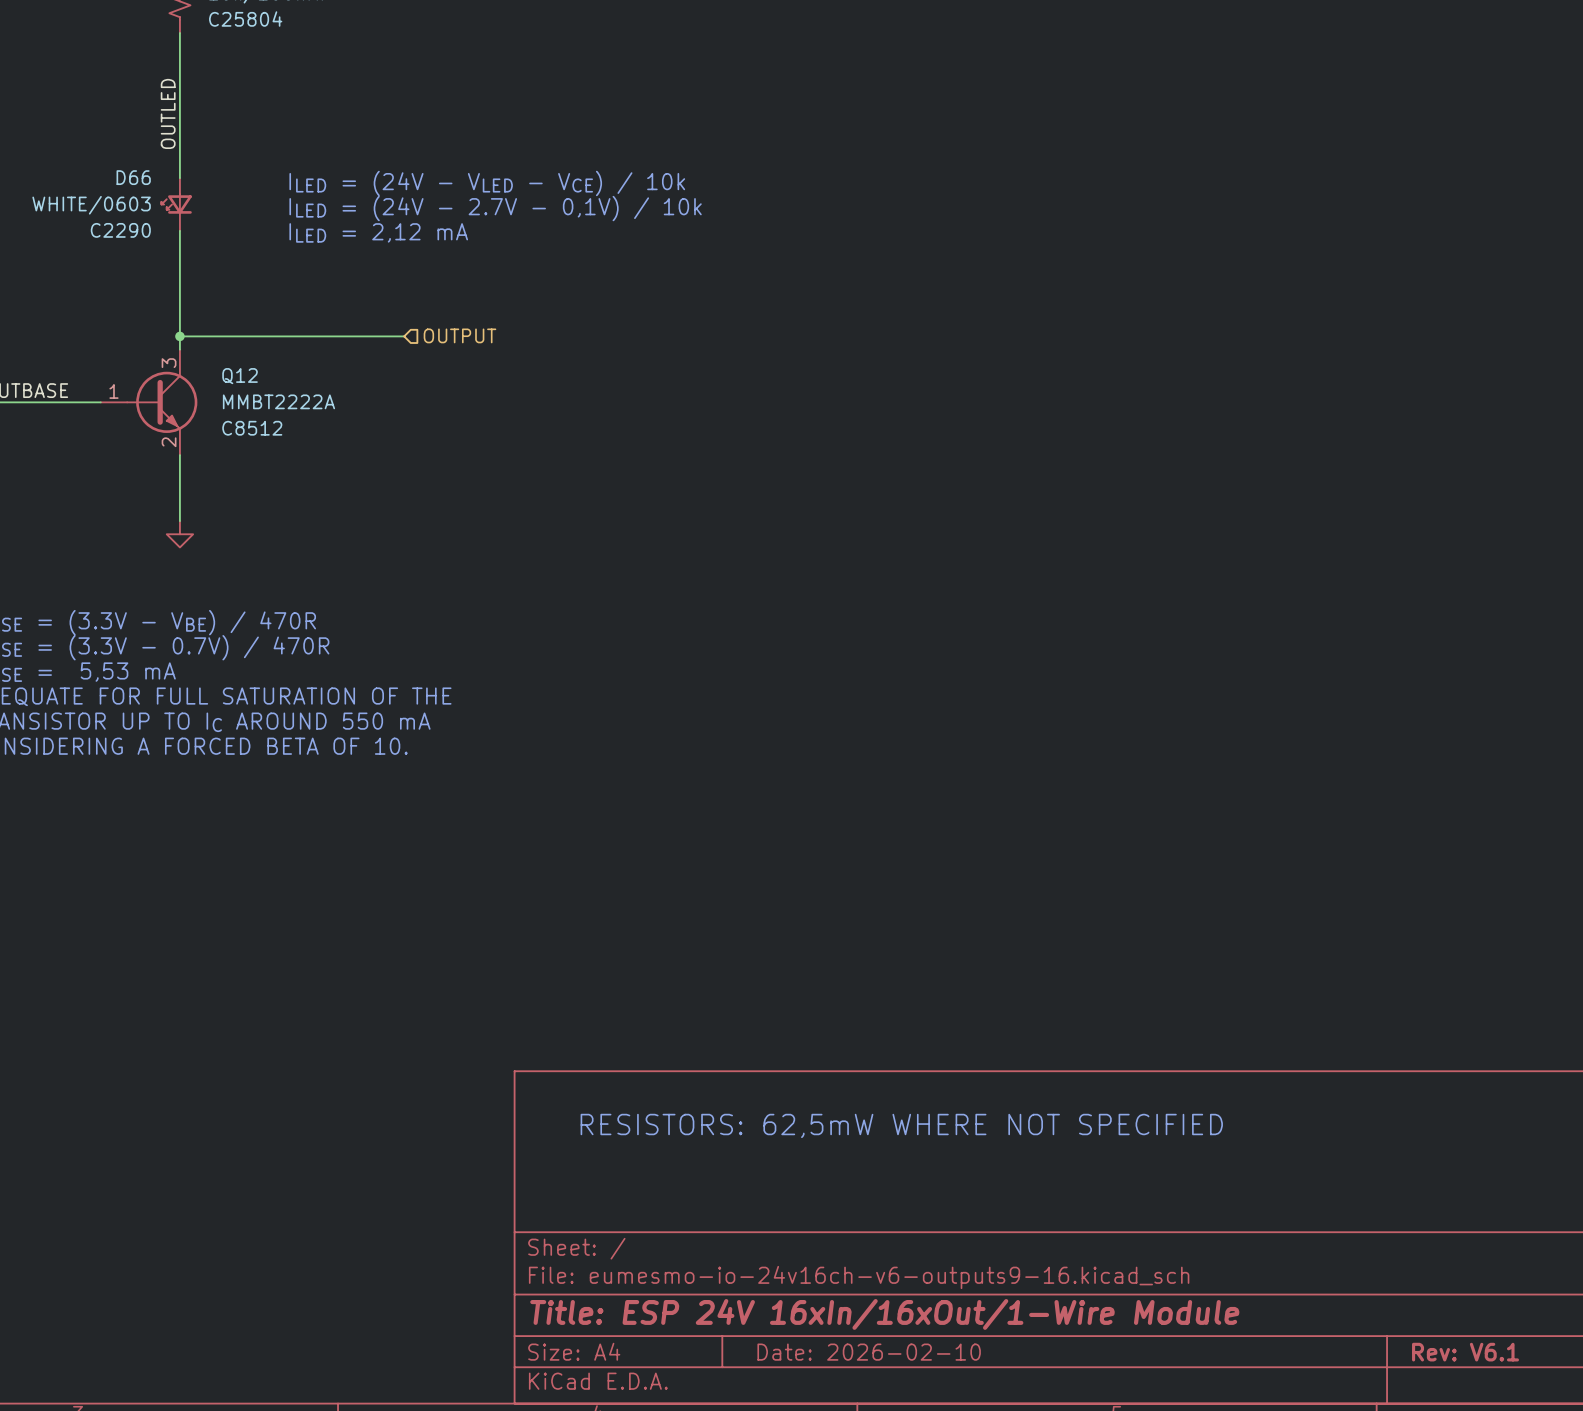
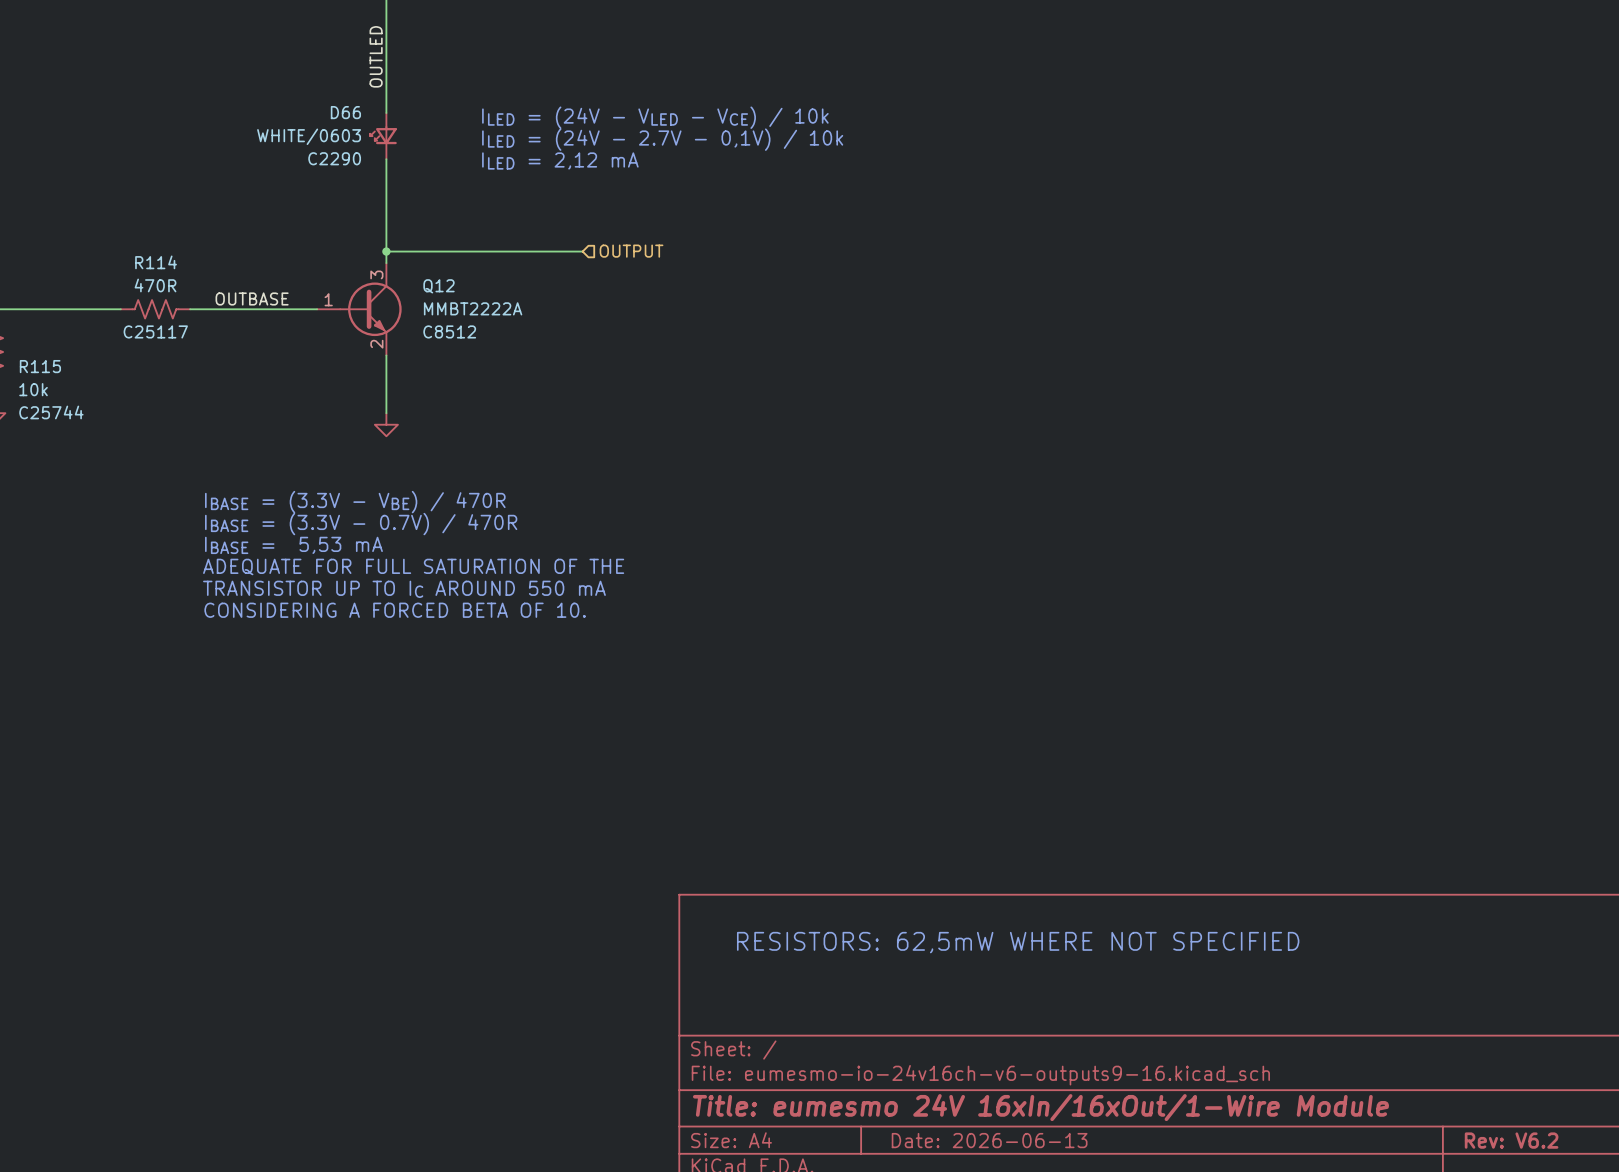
title block: Title: ESP 24V 16xIn/16xOut/1-Wire Module (884, 1314) -> Title: eumesmo 24V 16xIn/16xOut/1-Wire Module (1040, 1107)
title block: Date: 2026-02-10 (869, 1352) -> Date: 2026-06-13 (989, 1140)
title block: Rev: V6.1 (1465, 1352) -> Rev: V6.2 (1511, 1140)

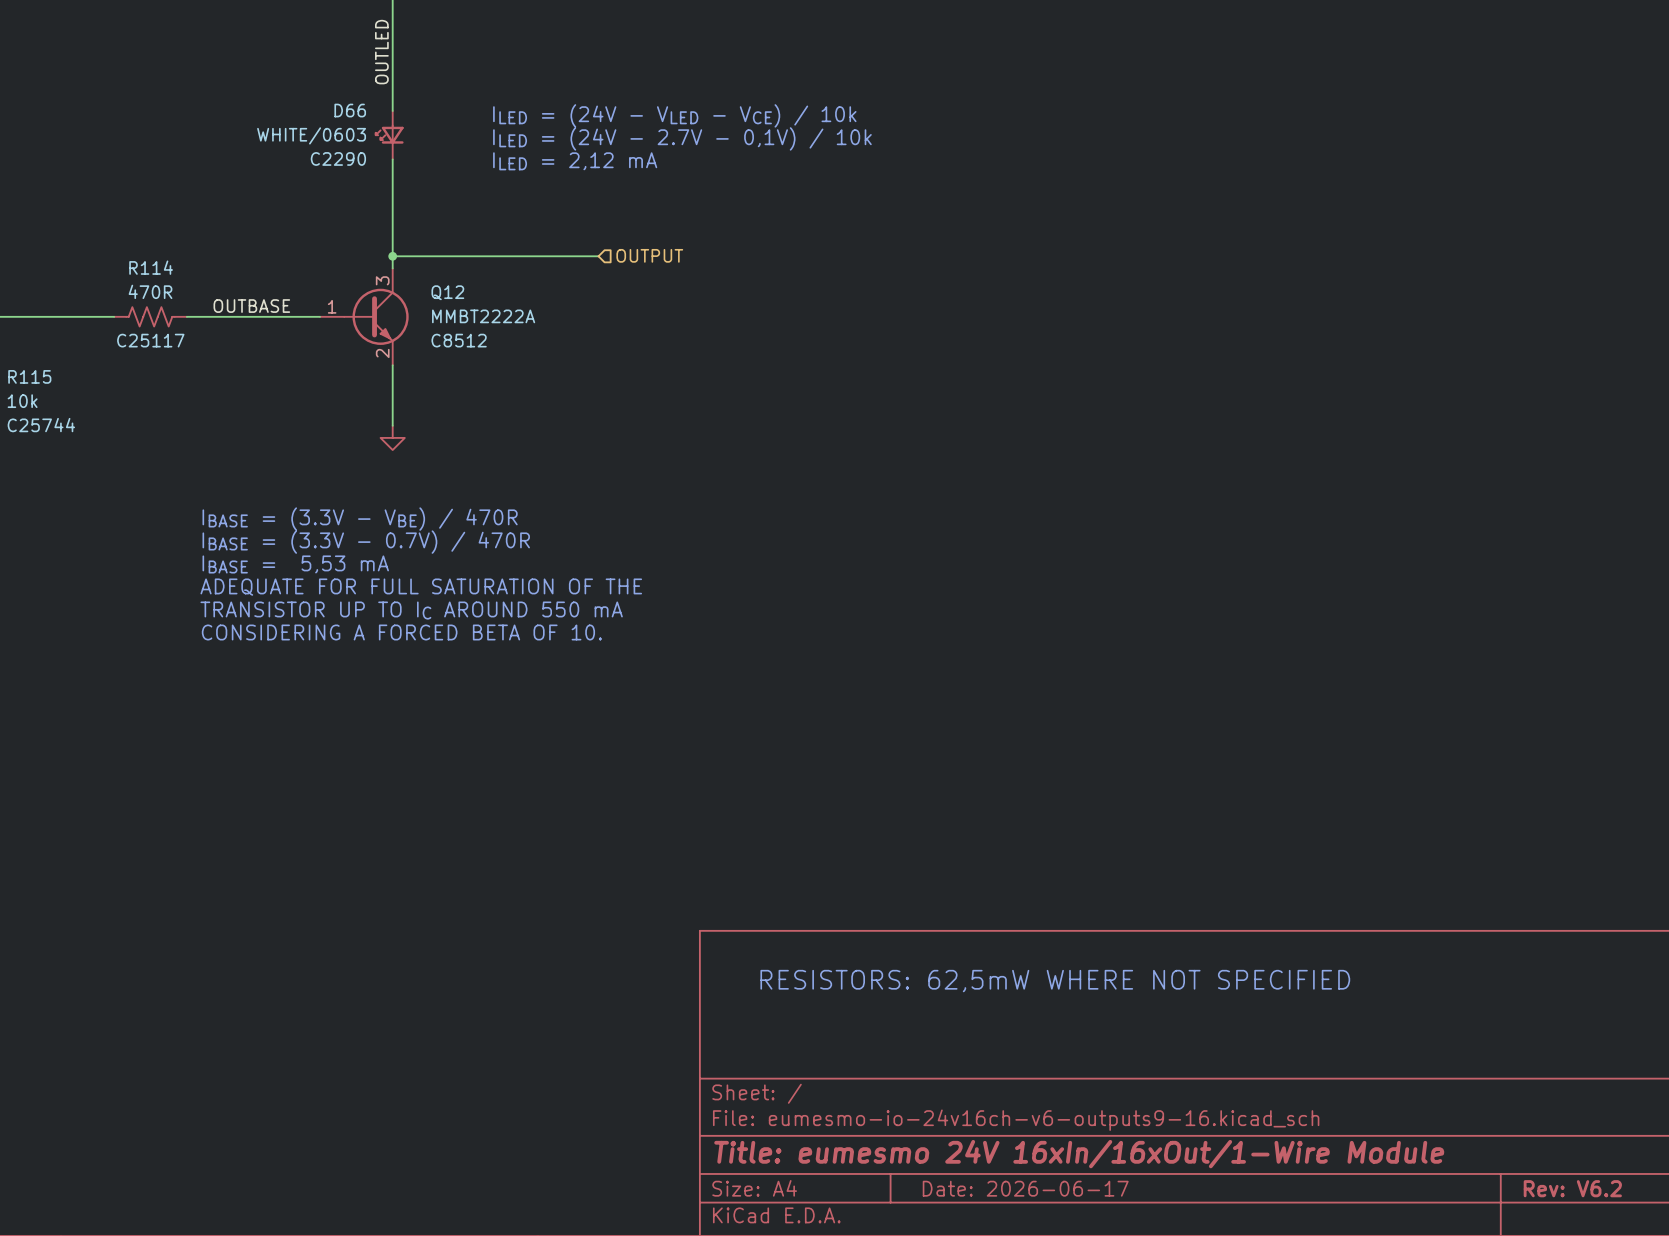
title block: Date: 2026-06-13 (989, 1140) -> Date: 2026-06-17 (1025, 1188)

